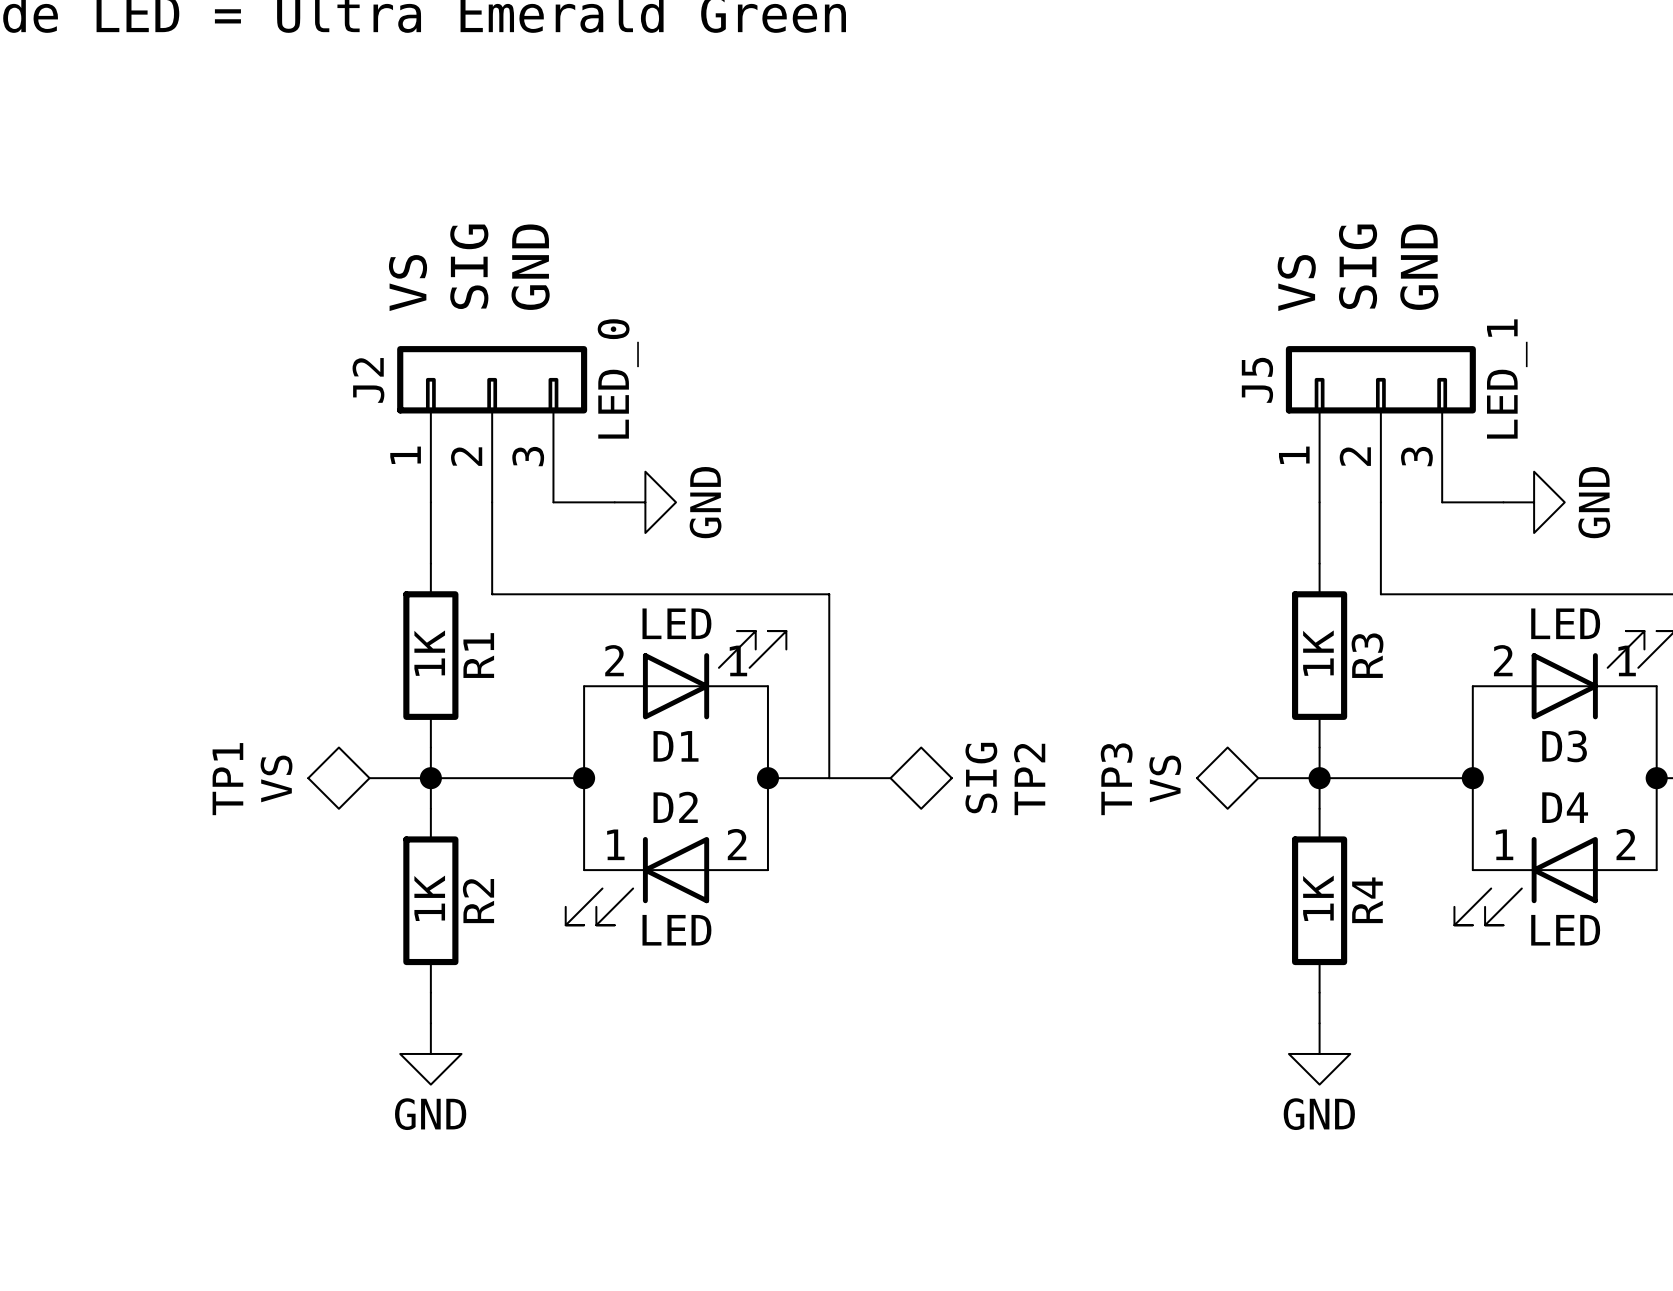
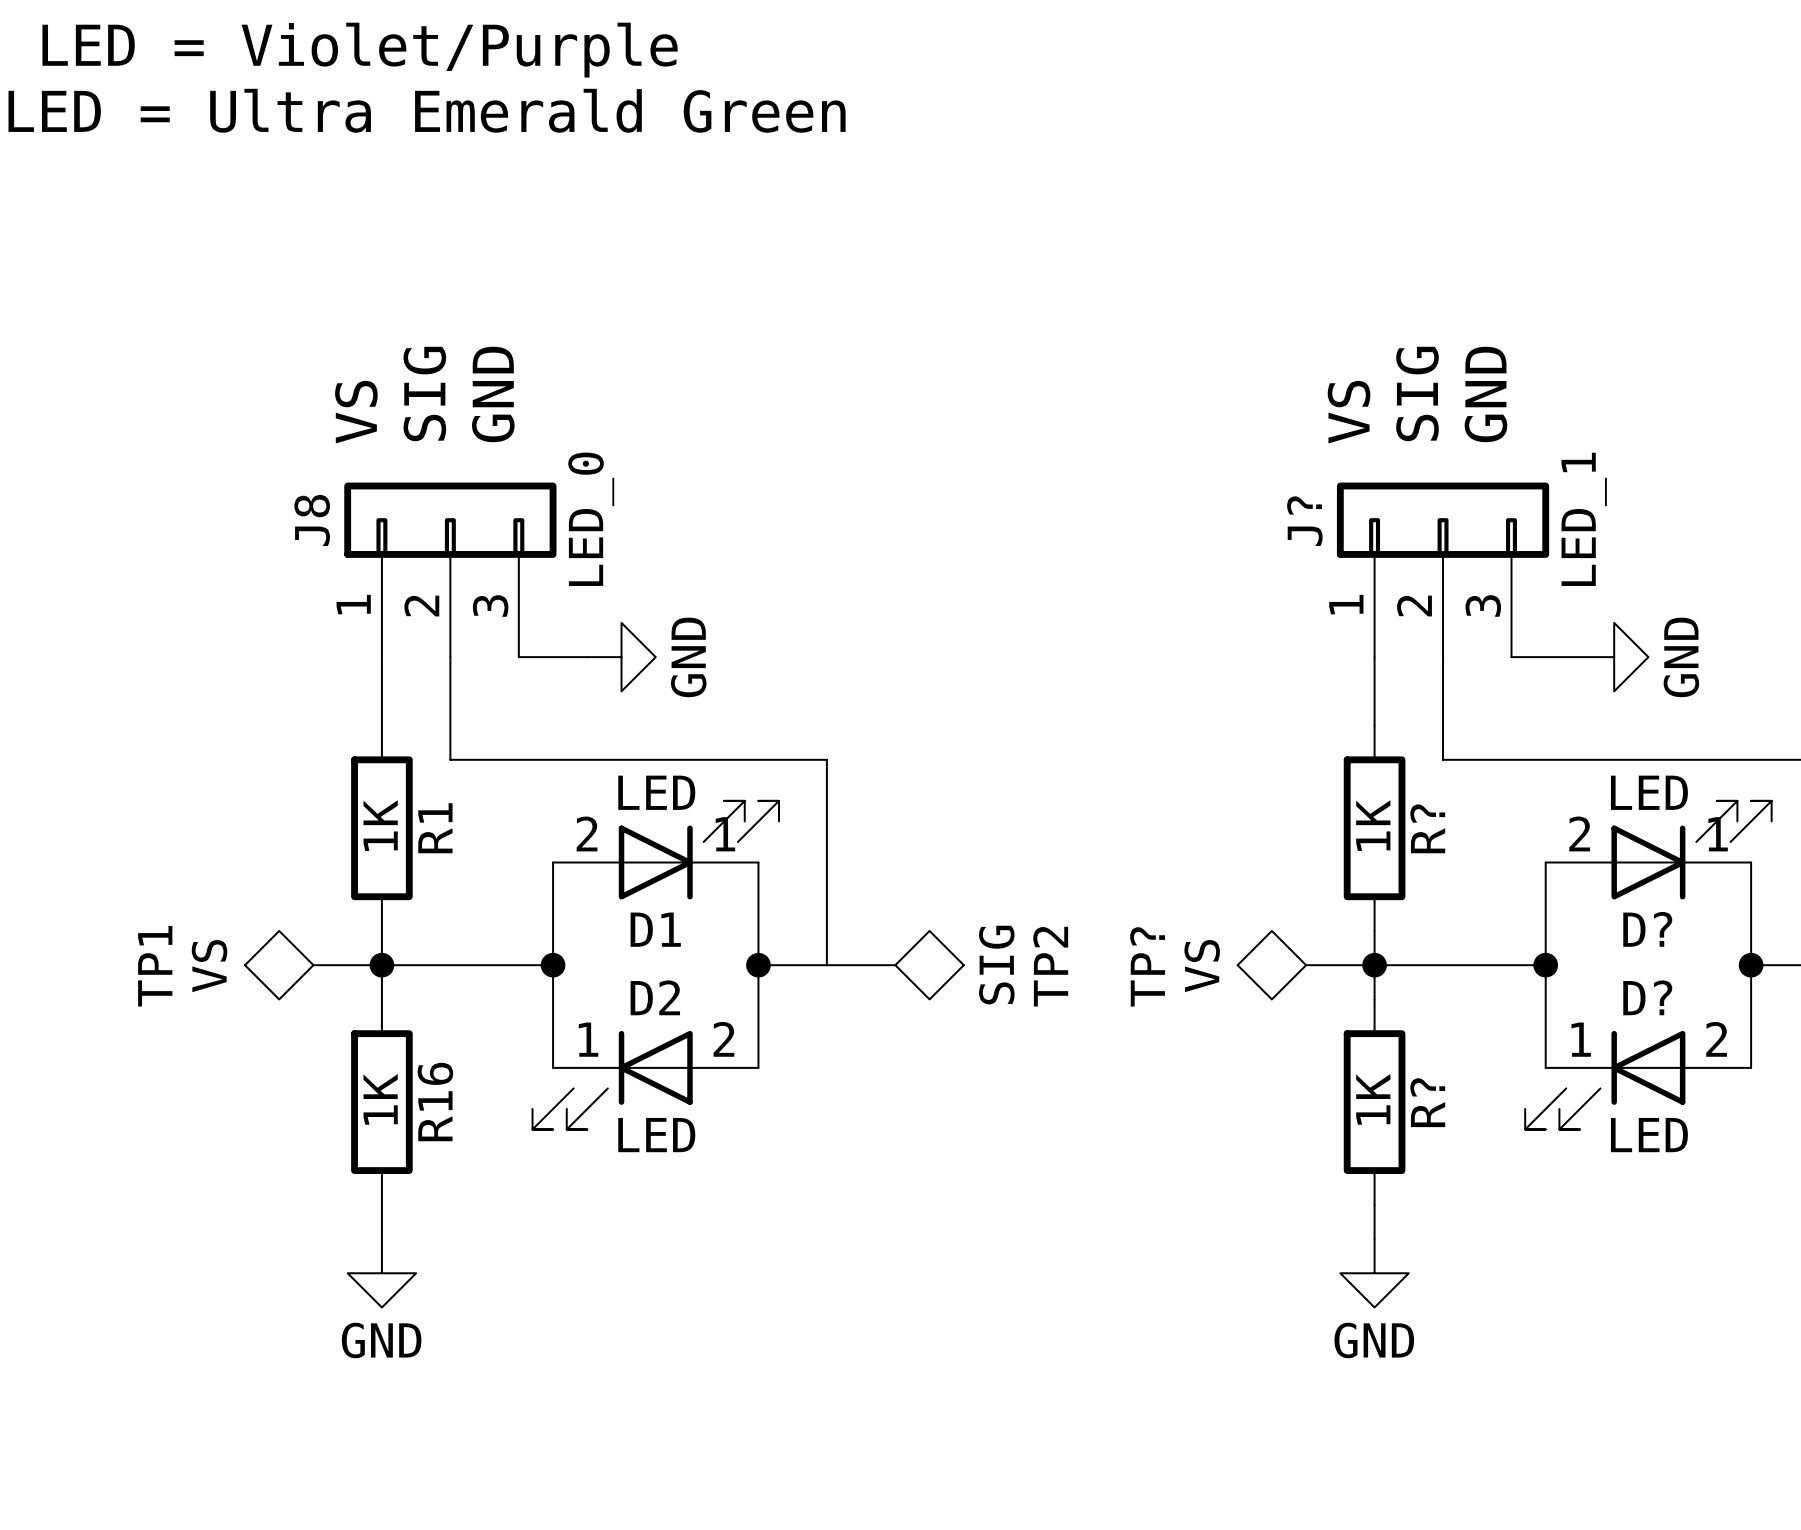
J2 name: J2 (368, 380) -> J8 (312, 520)
J5 name: J5 (1257, 380) -> J? (1304, 521)
R3 name: R3 (1367, 655) -> R? (1427, 828)
D3 name: D3 (1564, 746) -> D? (1647, 929)
TP3 name: TP3 (1116, 779) -> TP? (1147, 966)
D4 name: D4 (1565, 807) -> D? (1647, 997)
R4 name: R4 (1367, 900) -> R? (1427, 1102)
R2 name: R2 (478, 901) -> R16 (435, 1102)

